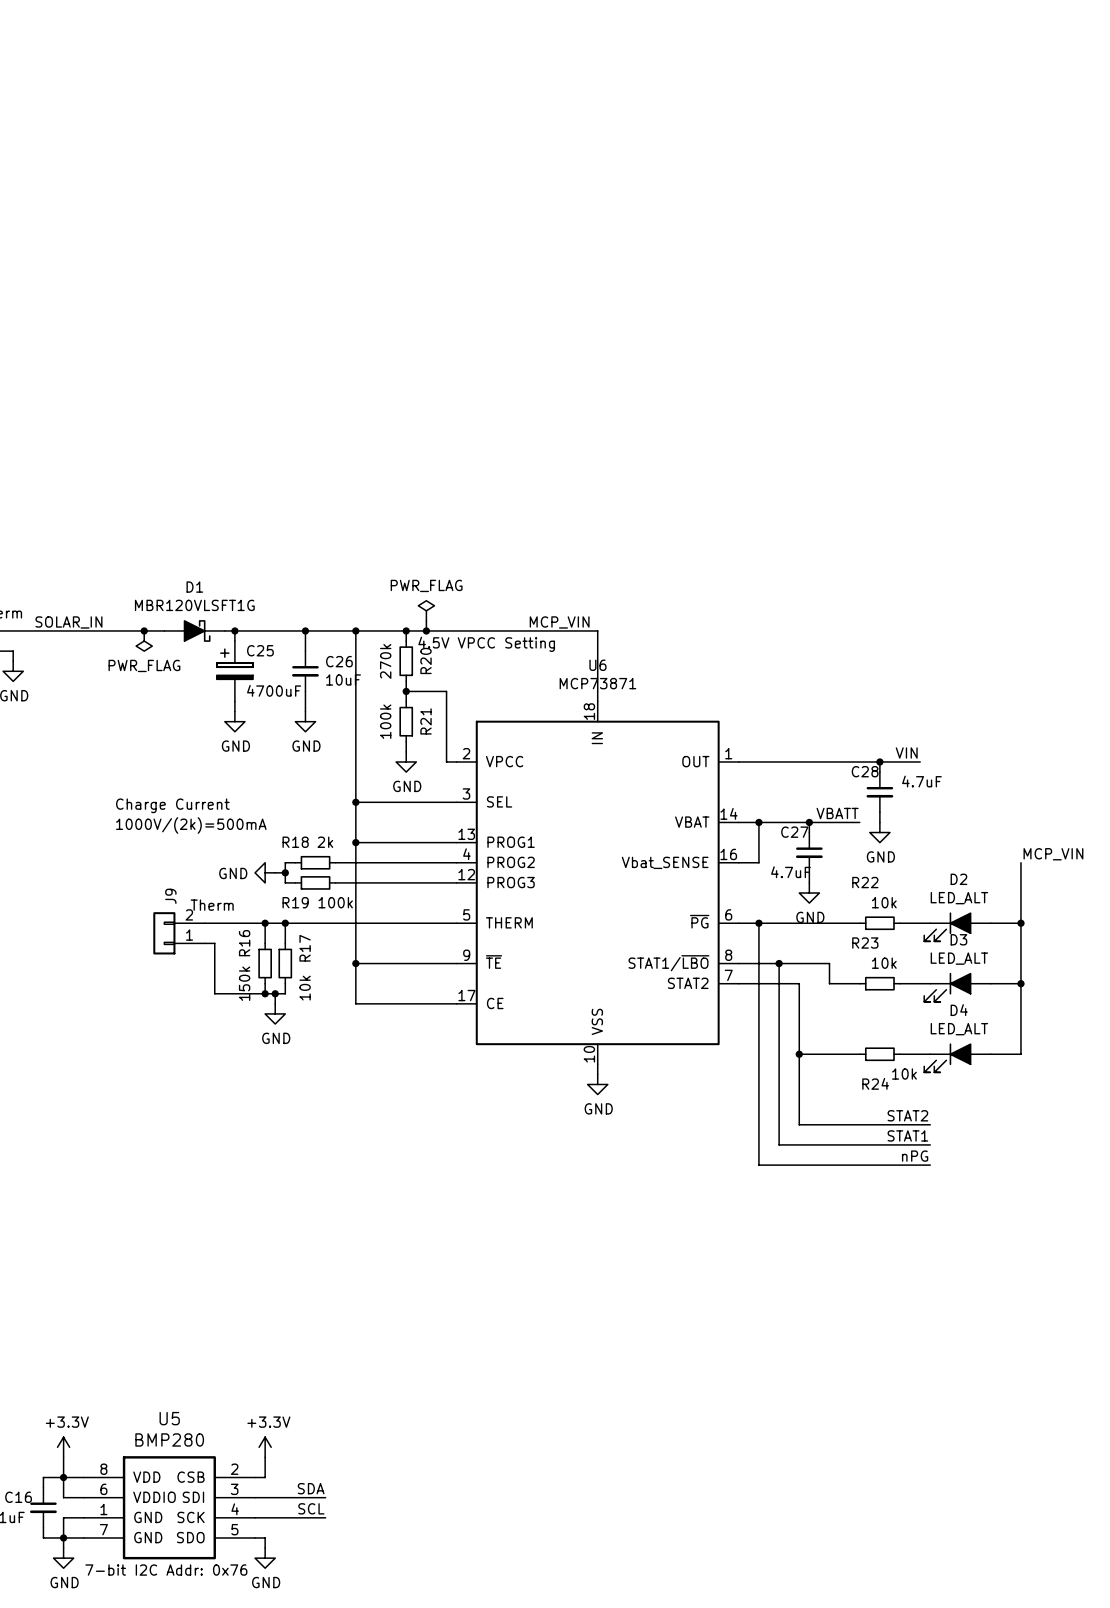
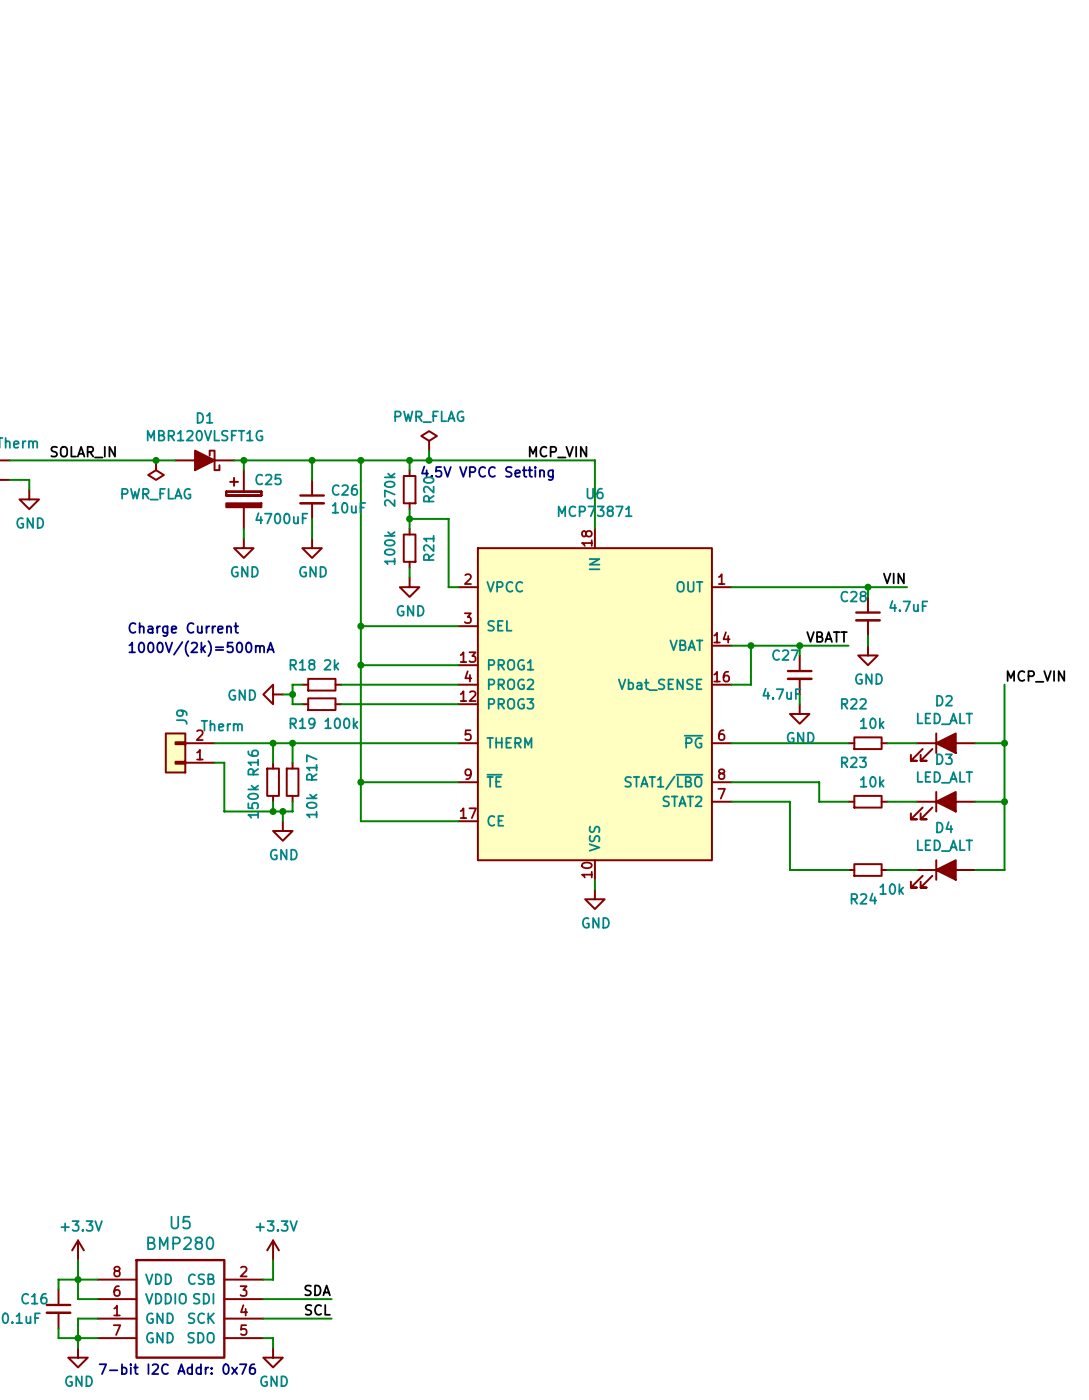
wire: (758, 923) (758, 1165) (930, 1165) -> none
junction: (758, 923) -> none
wire: (779, 963) (779, 1144) (930, 1144) -> none
junction: (779, 963) -> none
wire: (799, 1054) (799, 1124) (930, 1124) -> none
junction: (799, 1054) -> none
label: STAT2 (907, 1115) -> none
label: STAT1 (907, 1135) -> none
label: nPG (915, 1156) -> none

